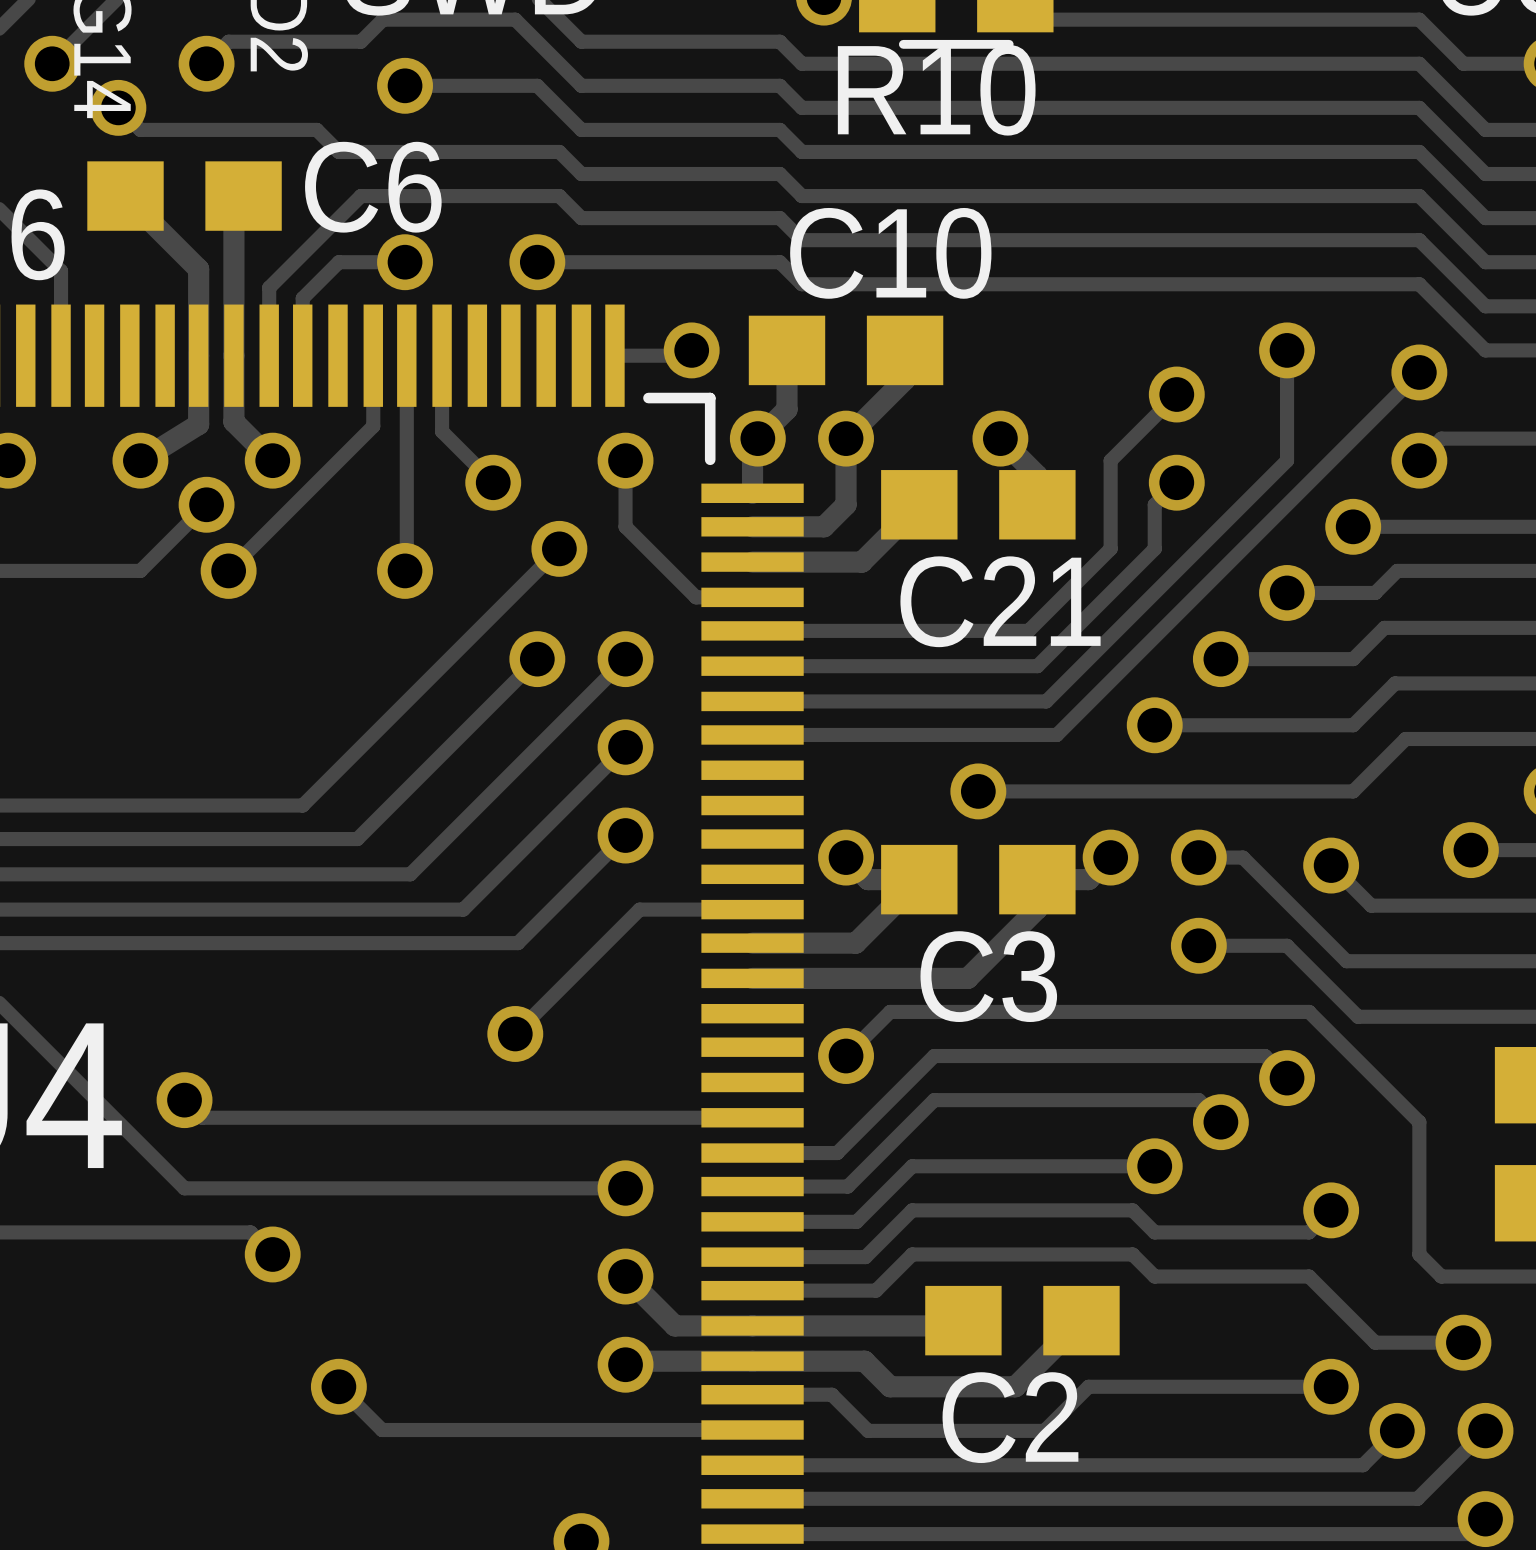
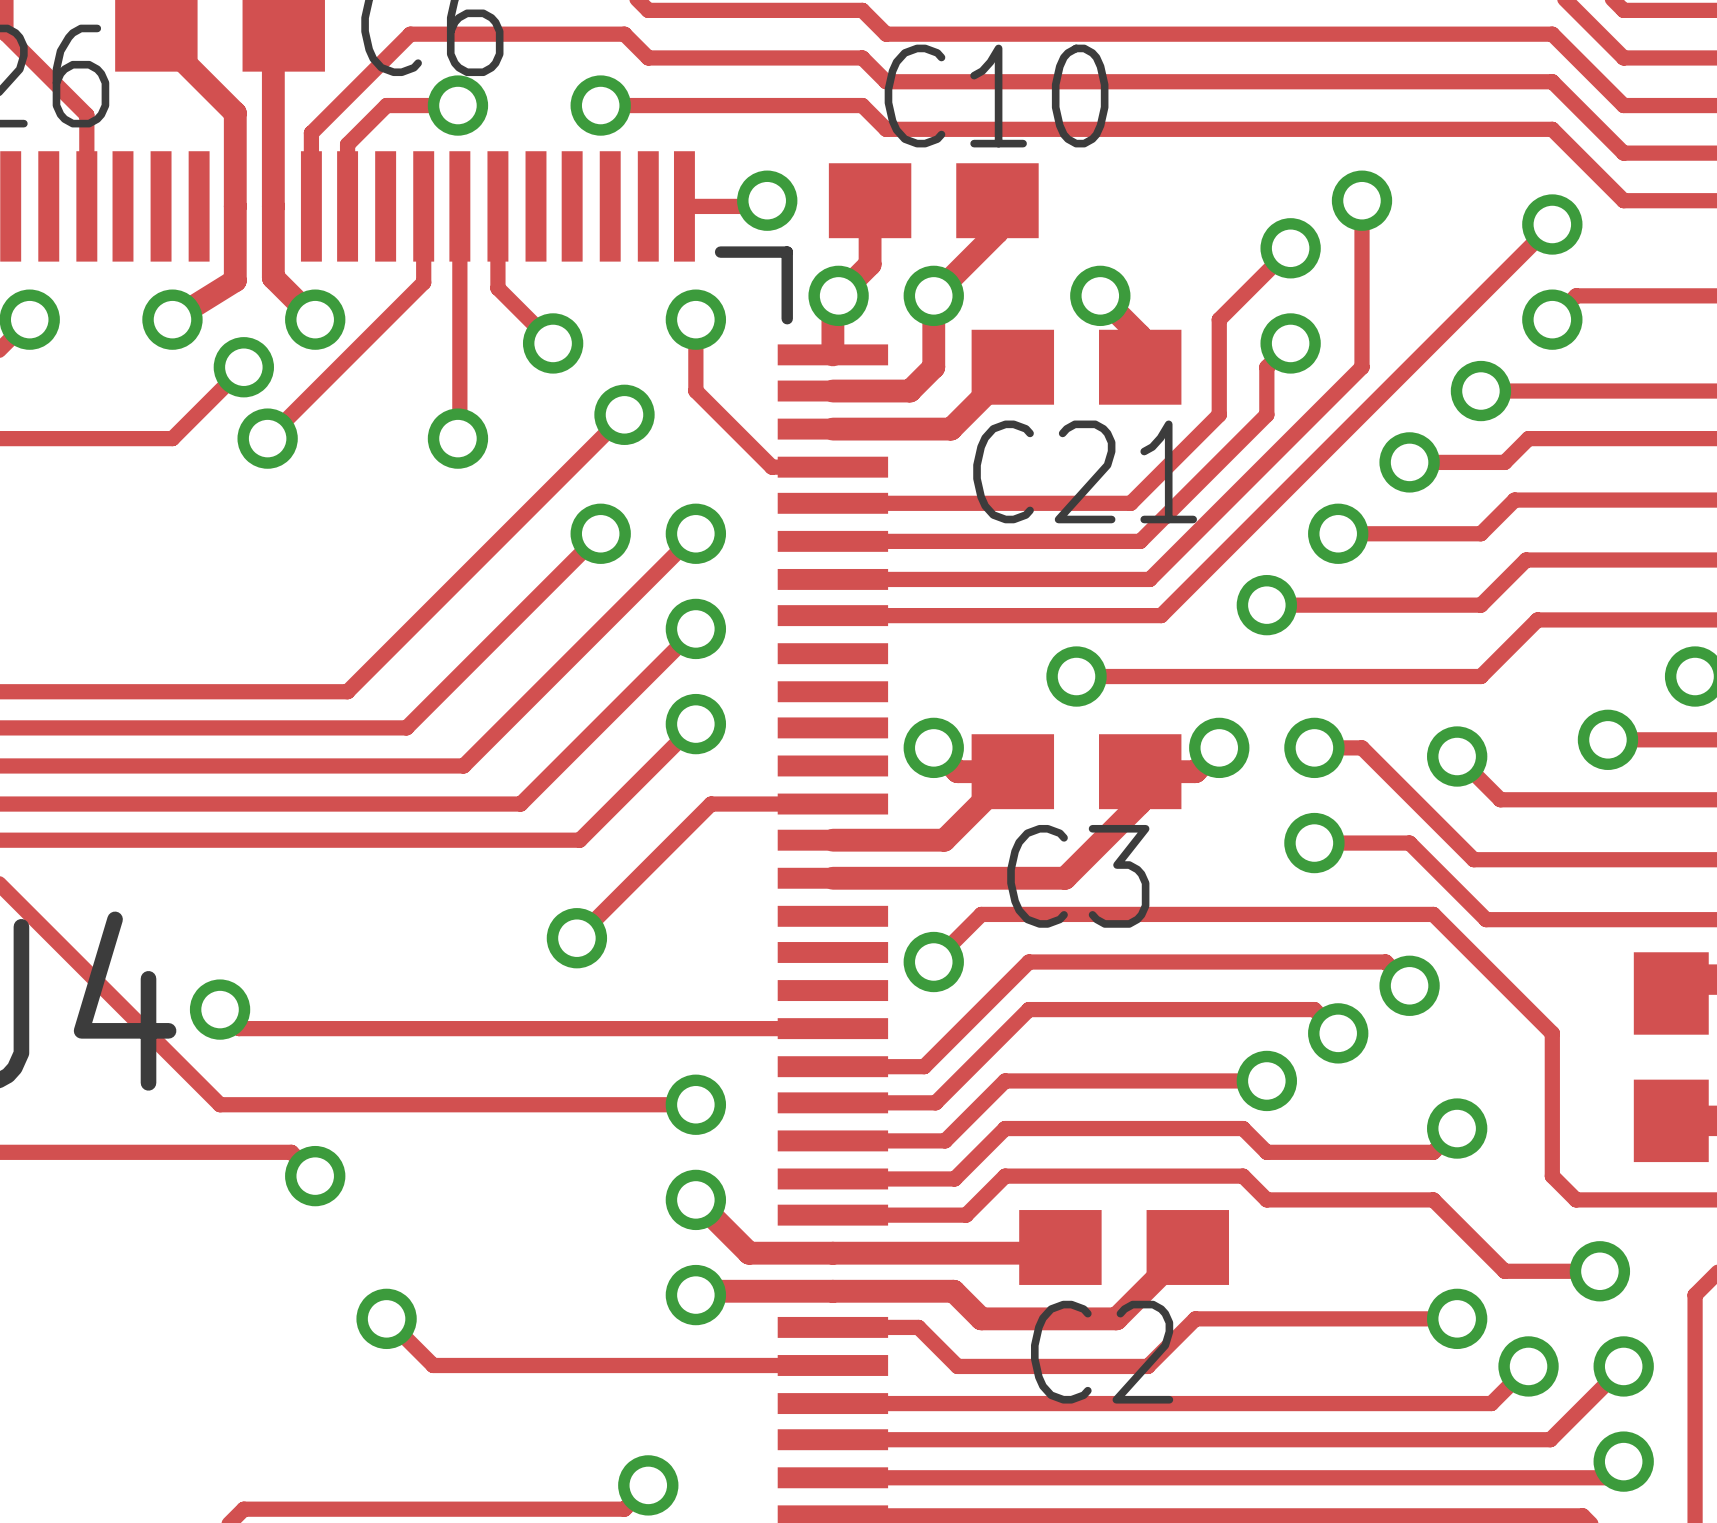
track: (1287, 350) (1287, 460) (1242, 504) -> (1362, 200) (1362, 367)
via position: (1287, 350) -> (1362, 200)

